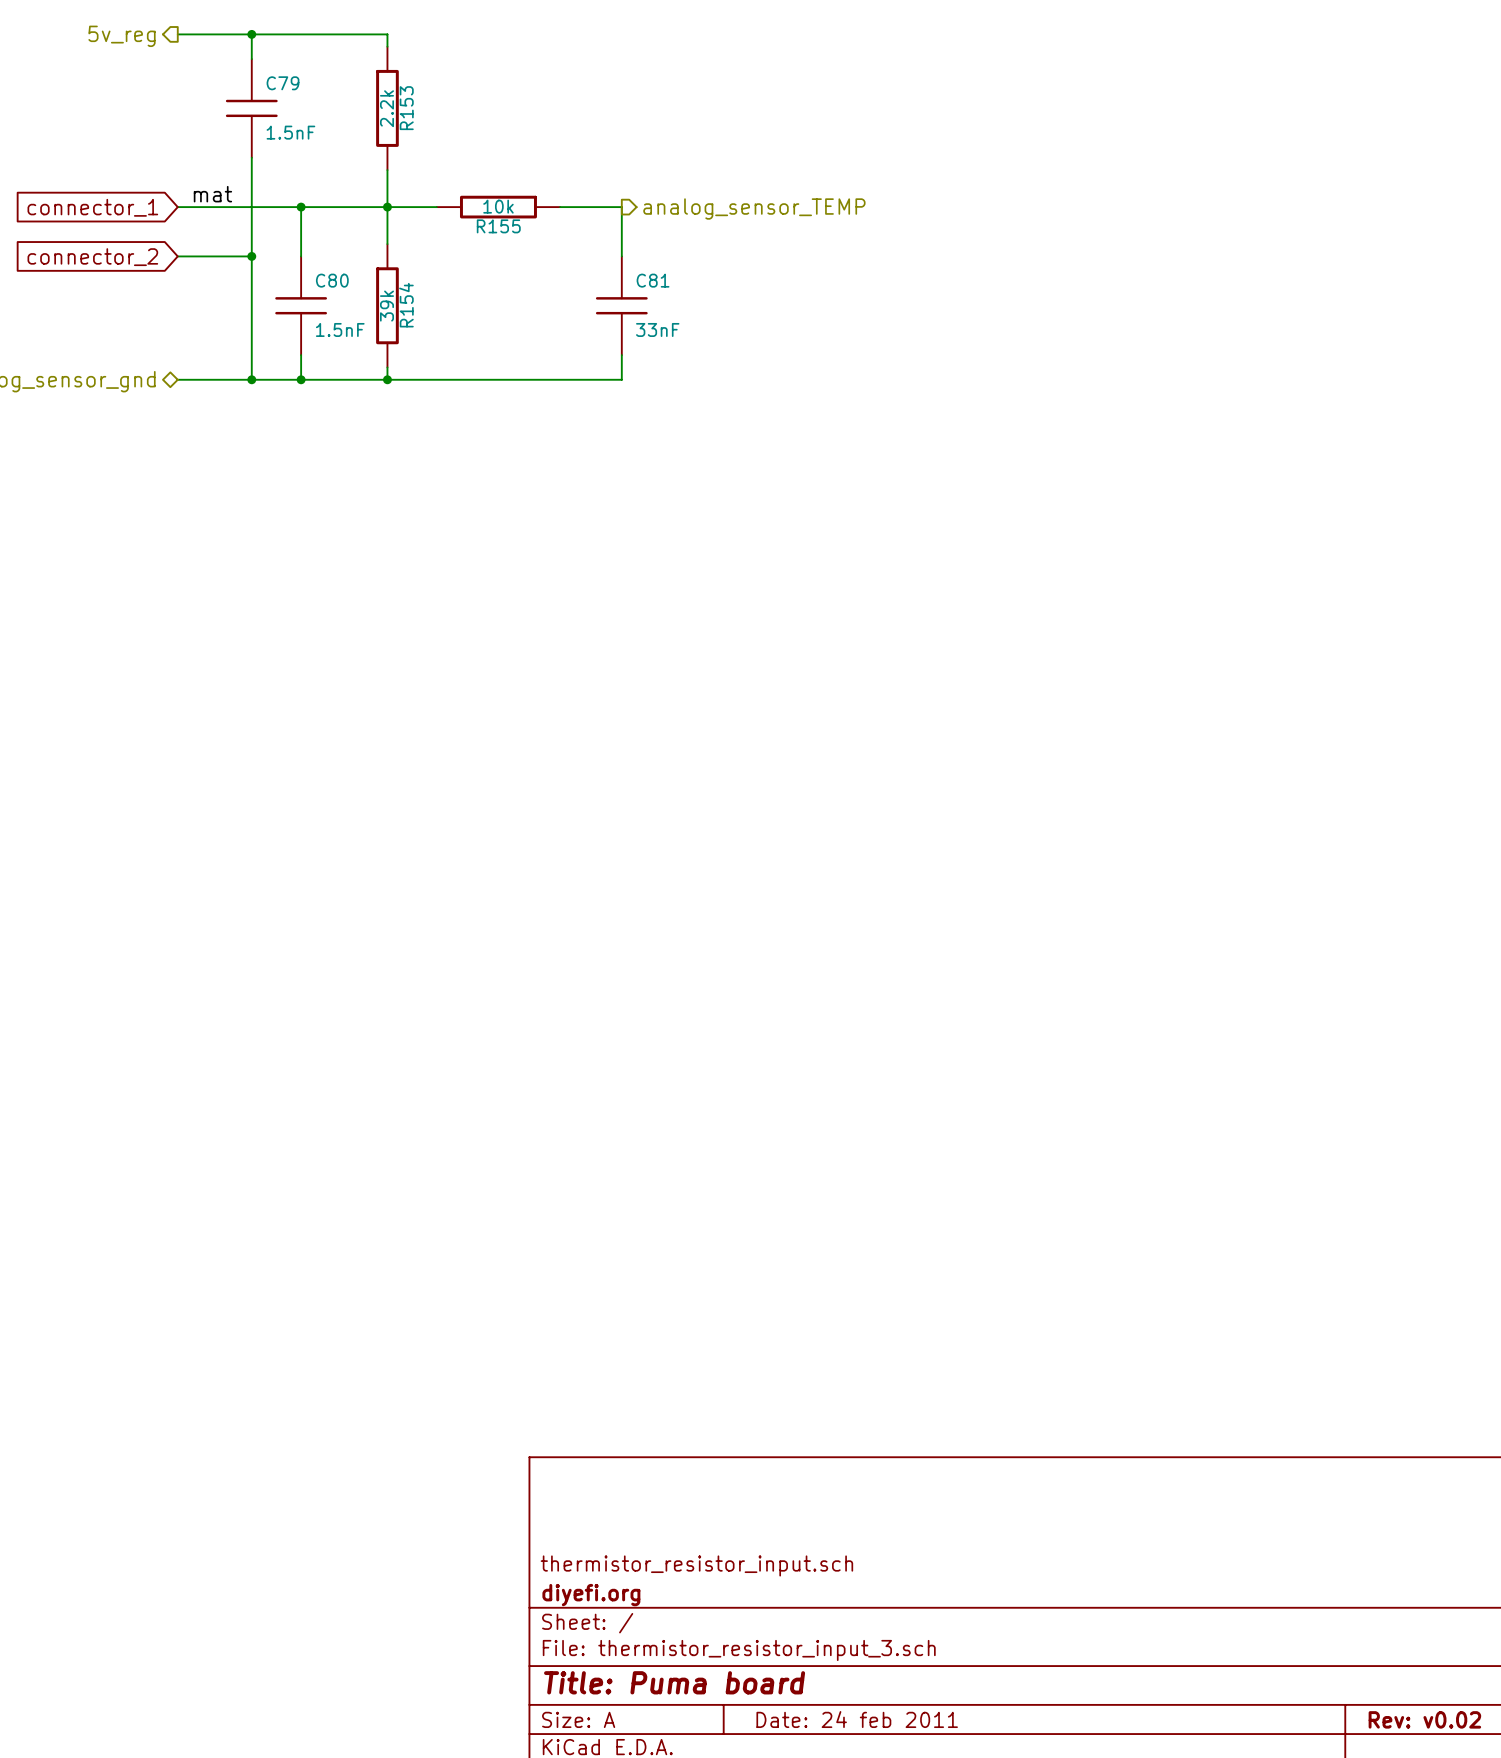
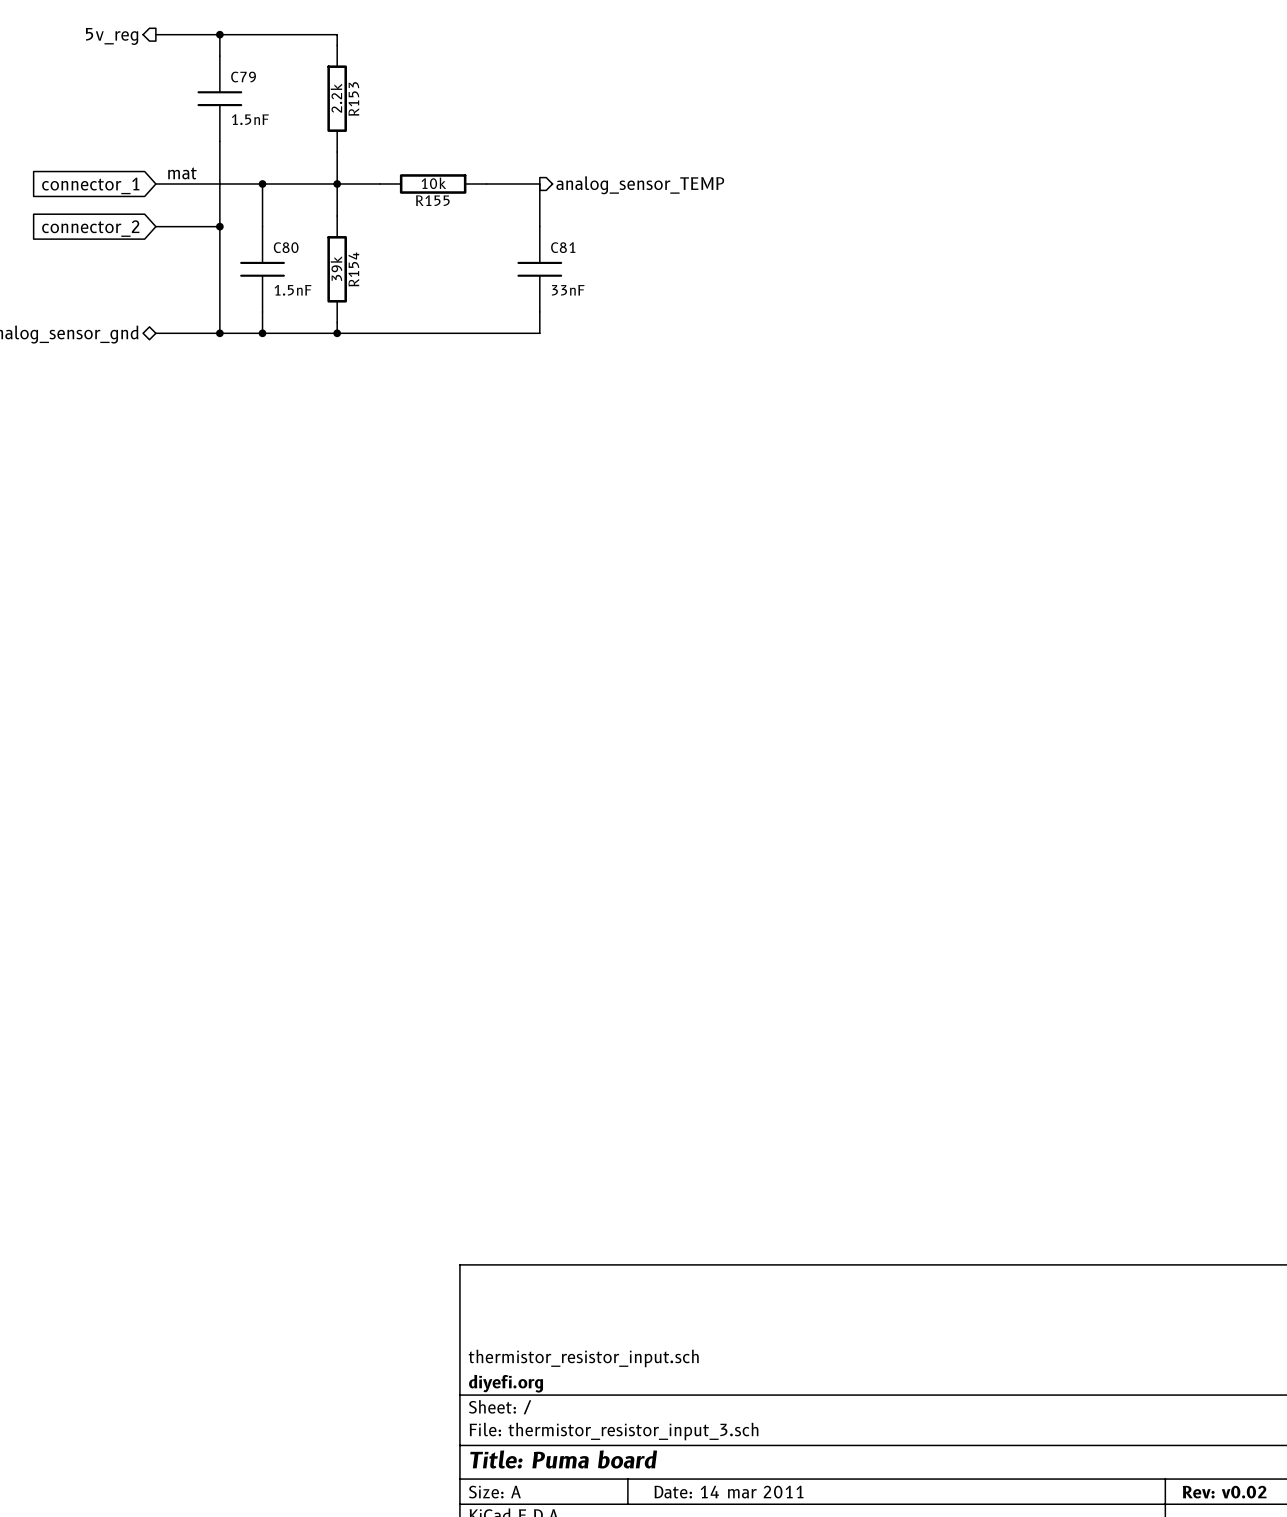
title block: Date: 24 feb 2011 (857, 1719) -> Date: 14 mar 2011 (729, 1492)

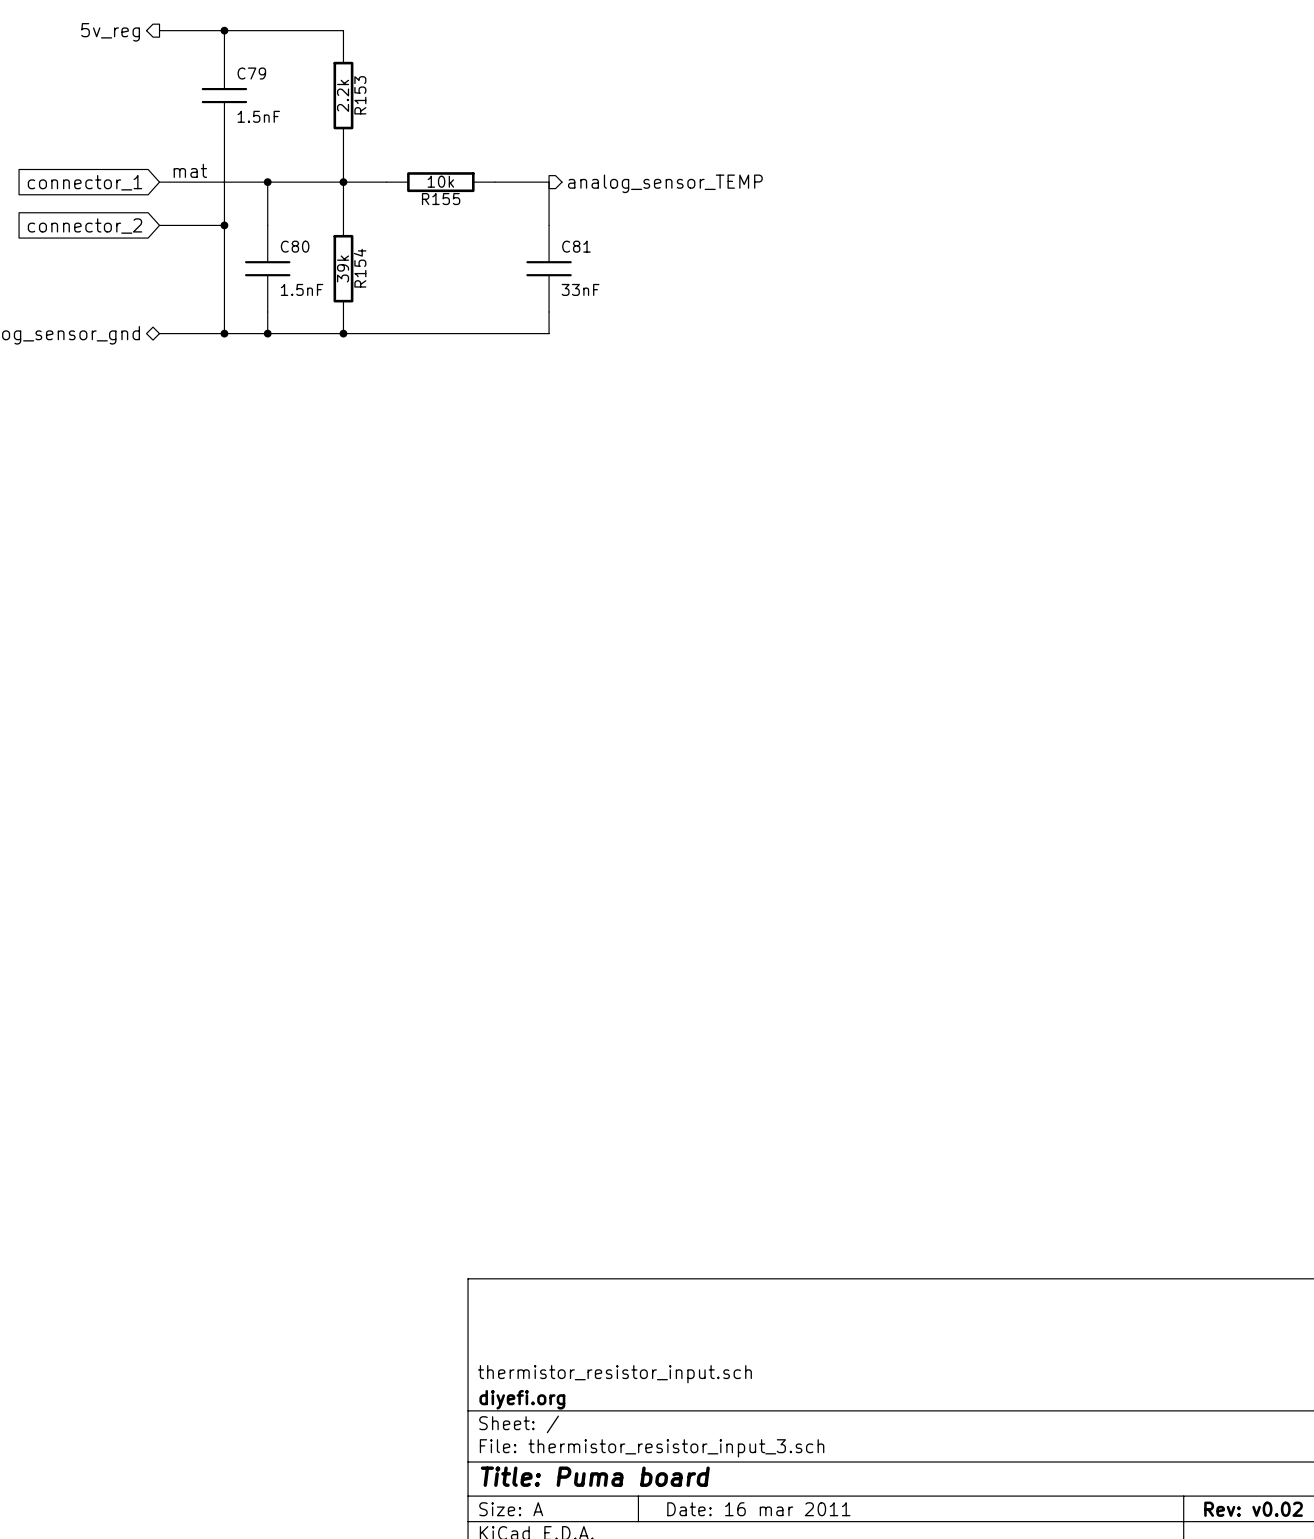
title block: Date: 14 mar 2011 (729, 1492) -> Date: 16 mar 2011 (758, 1509)

